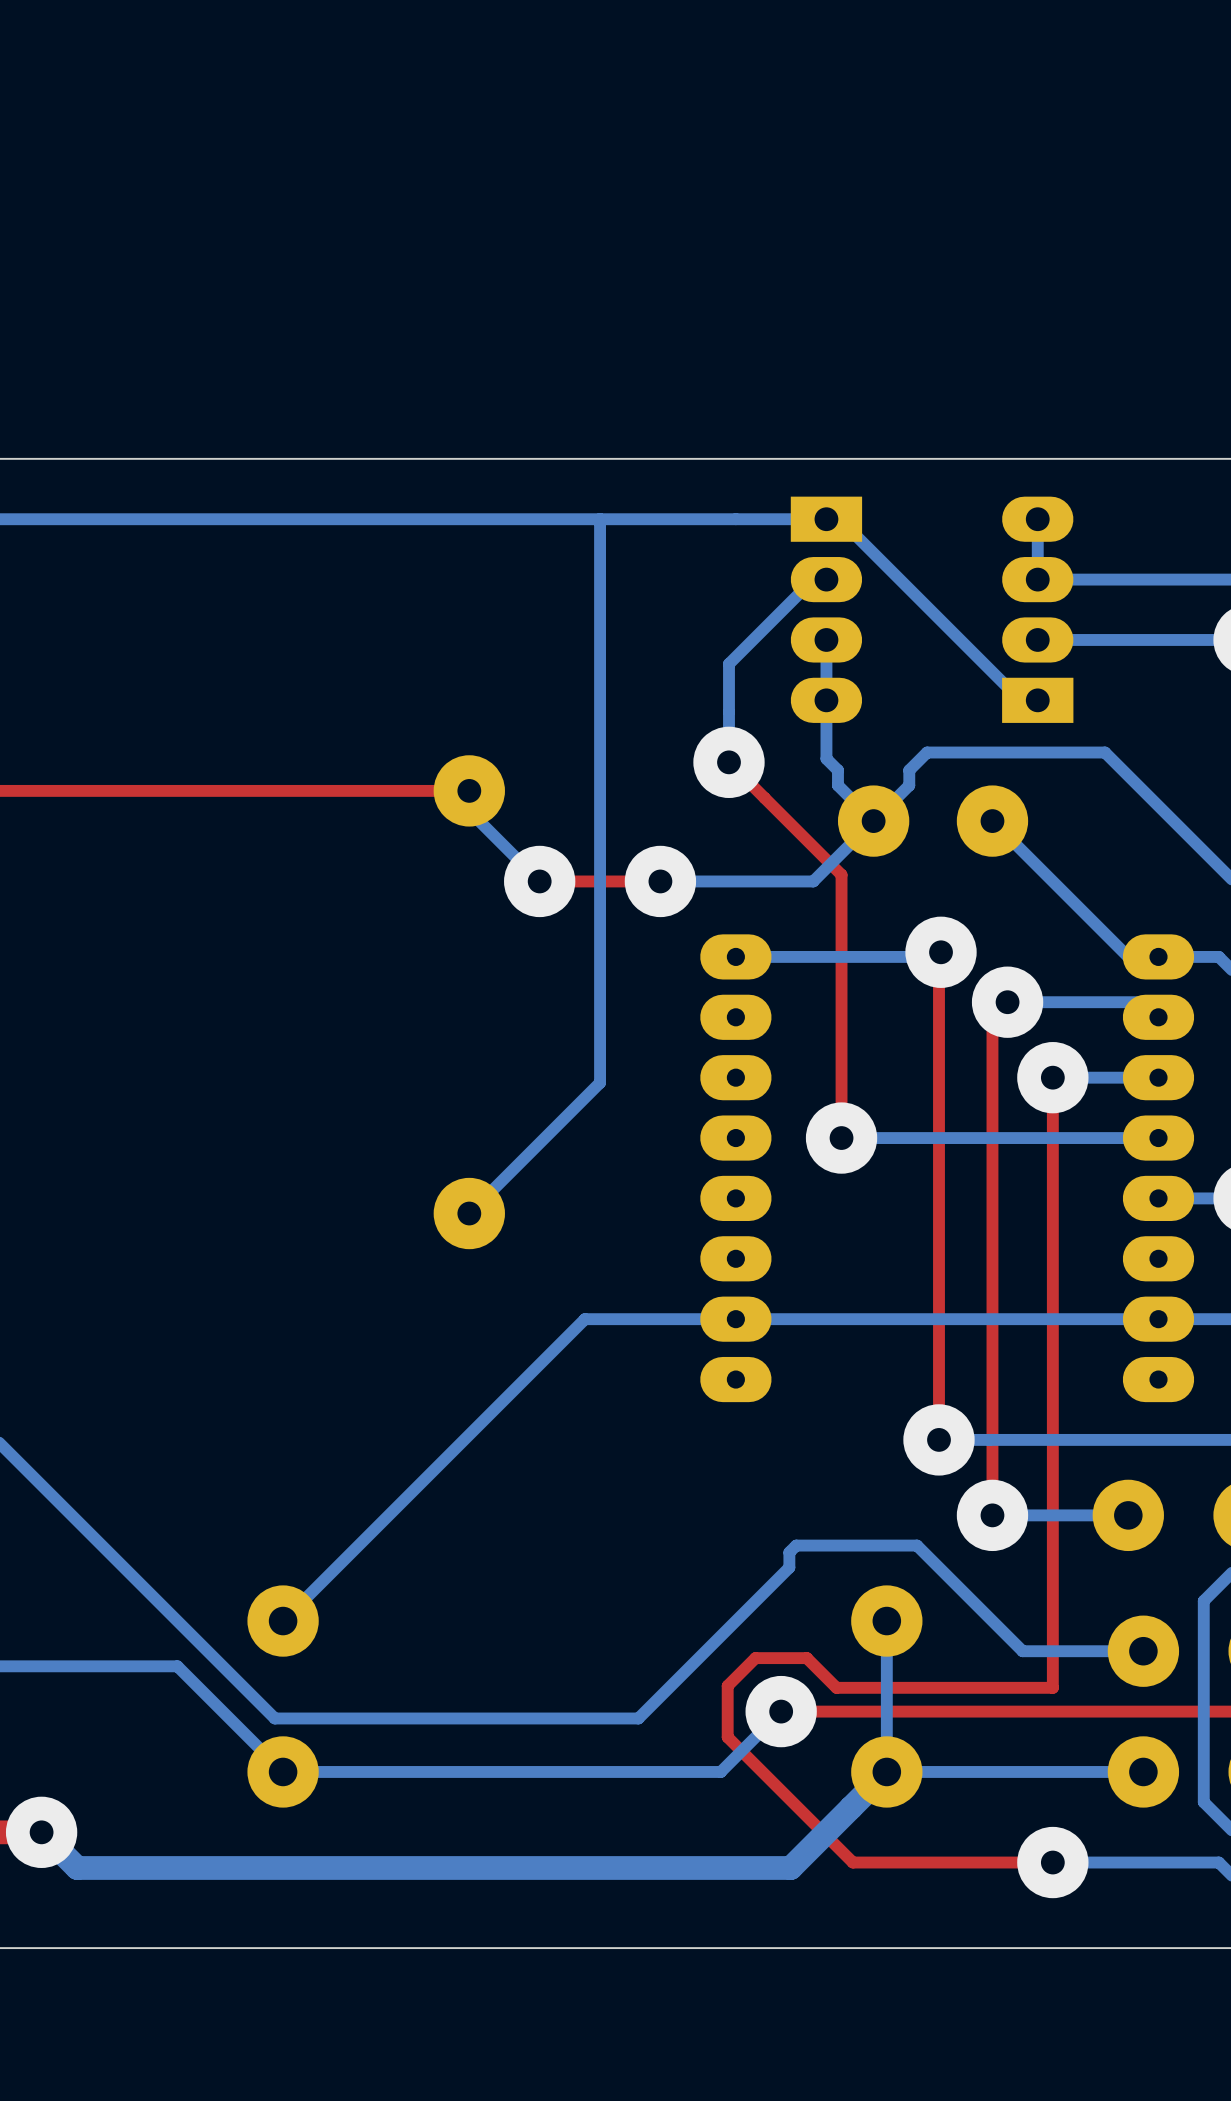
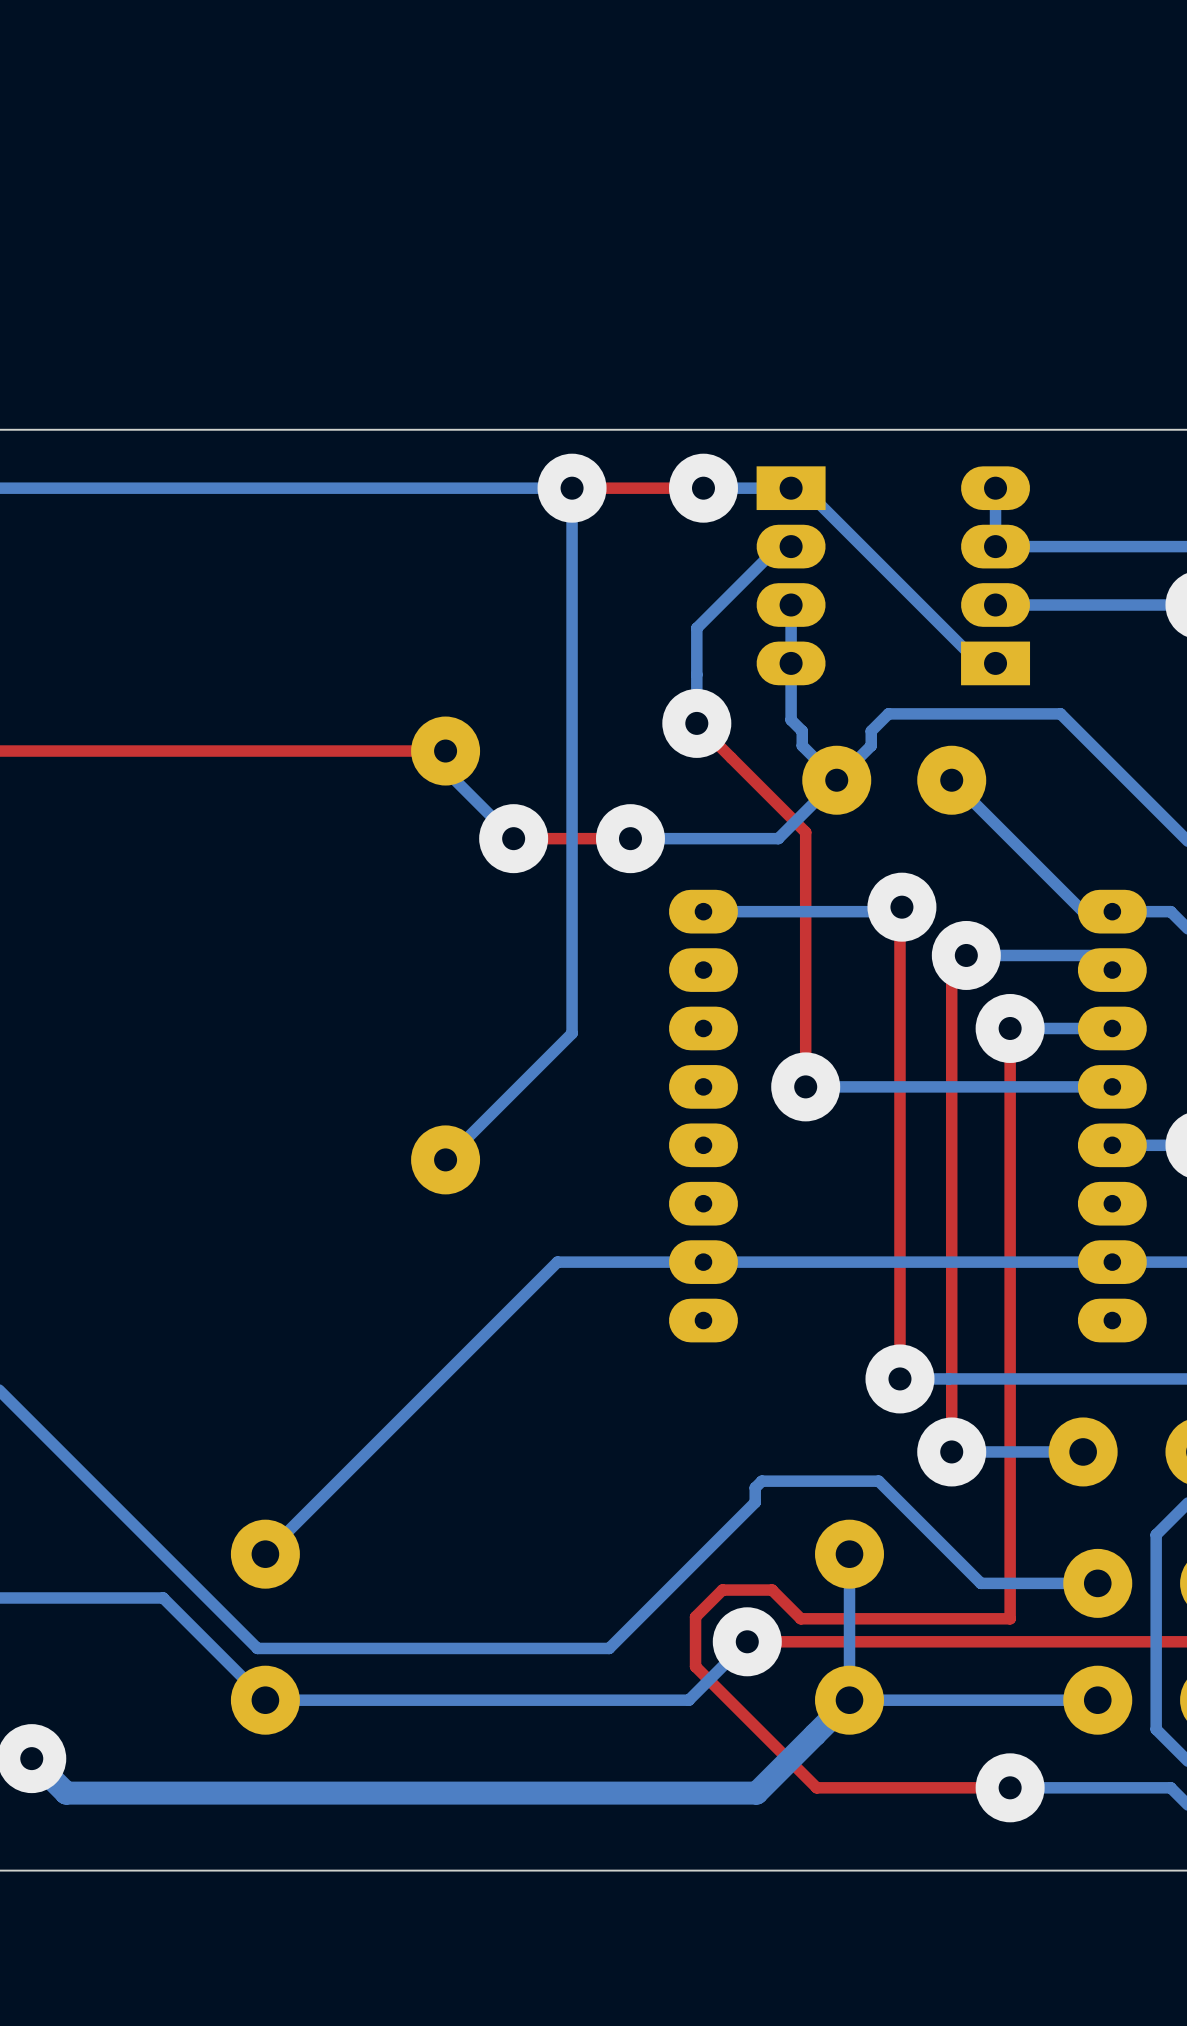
via: none -> (572, 488)
top track: none -> (703, 488) (572, 488)
bottom track: (735, 519) (600, 519) -> none
via: none -> (703, 488)

